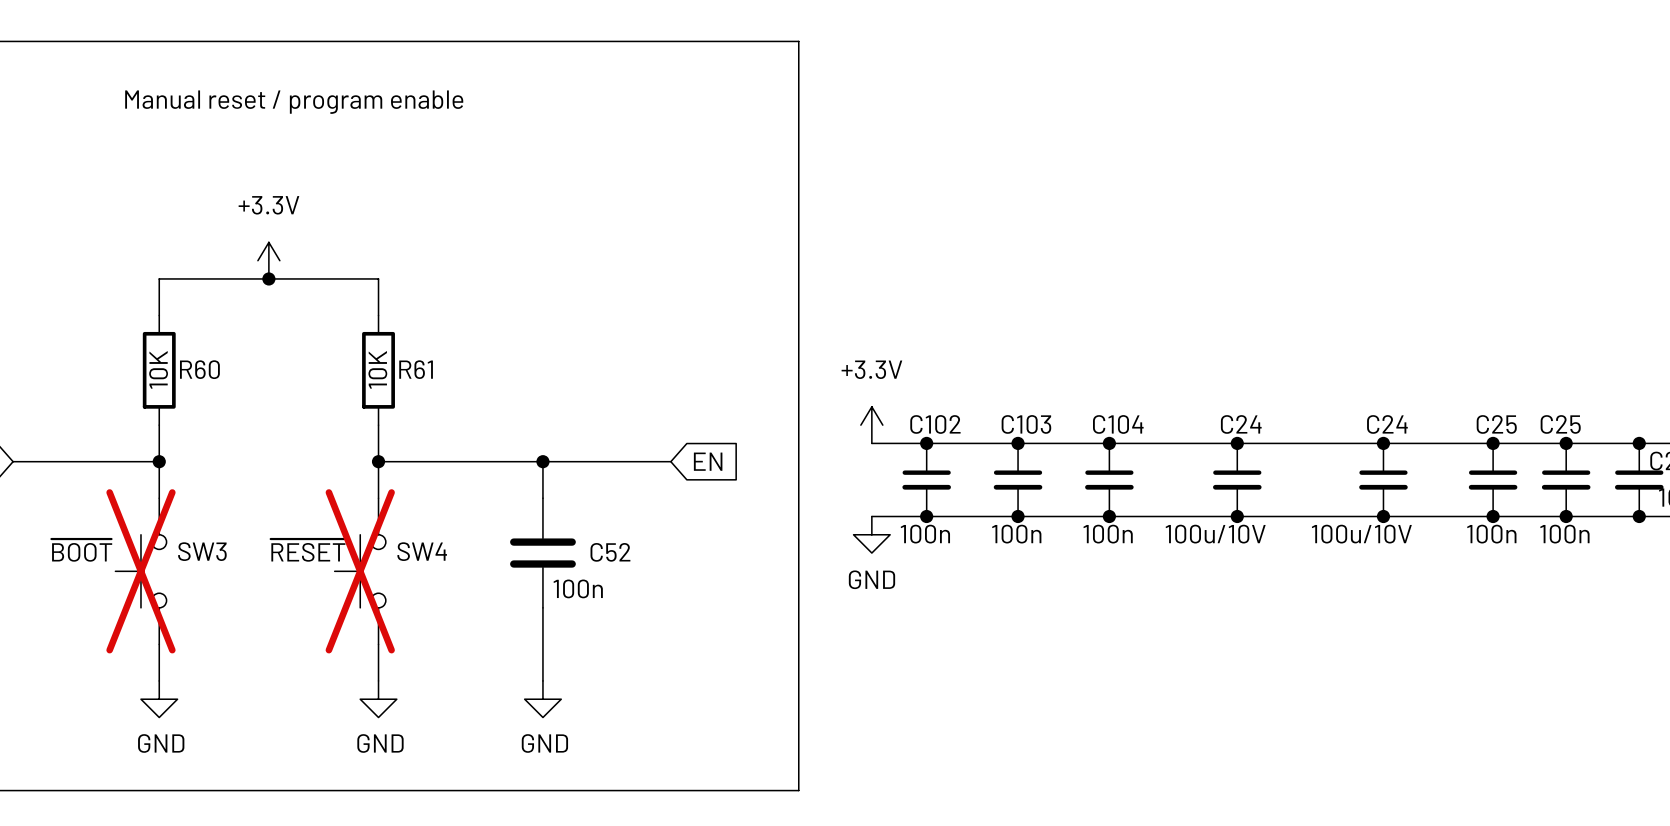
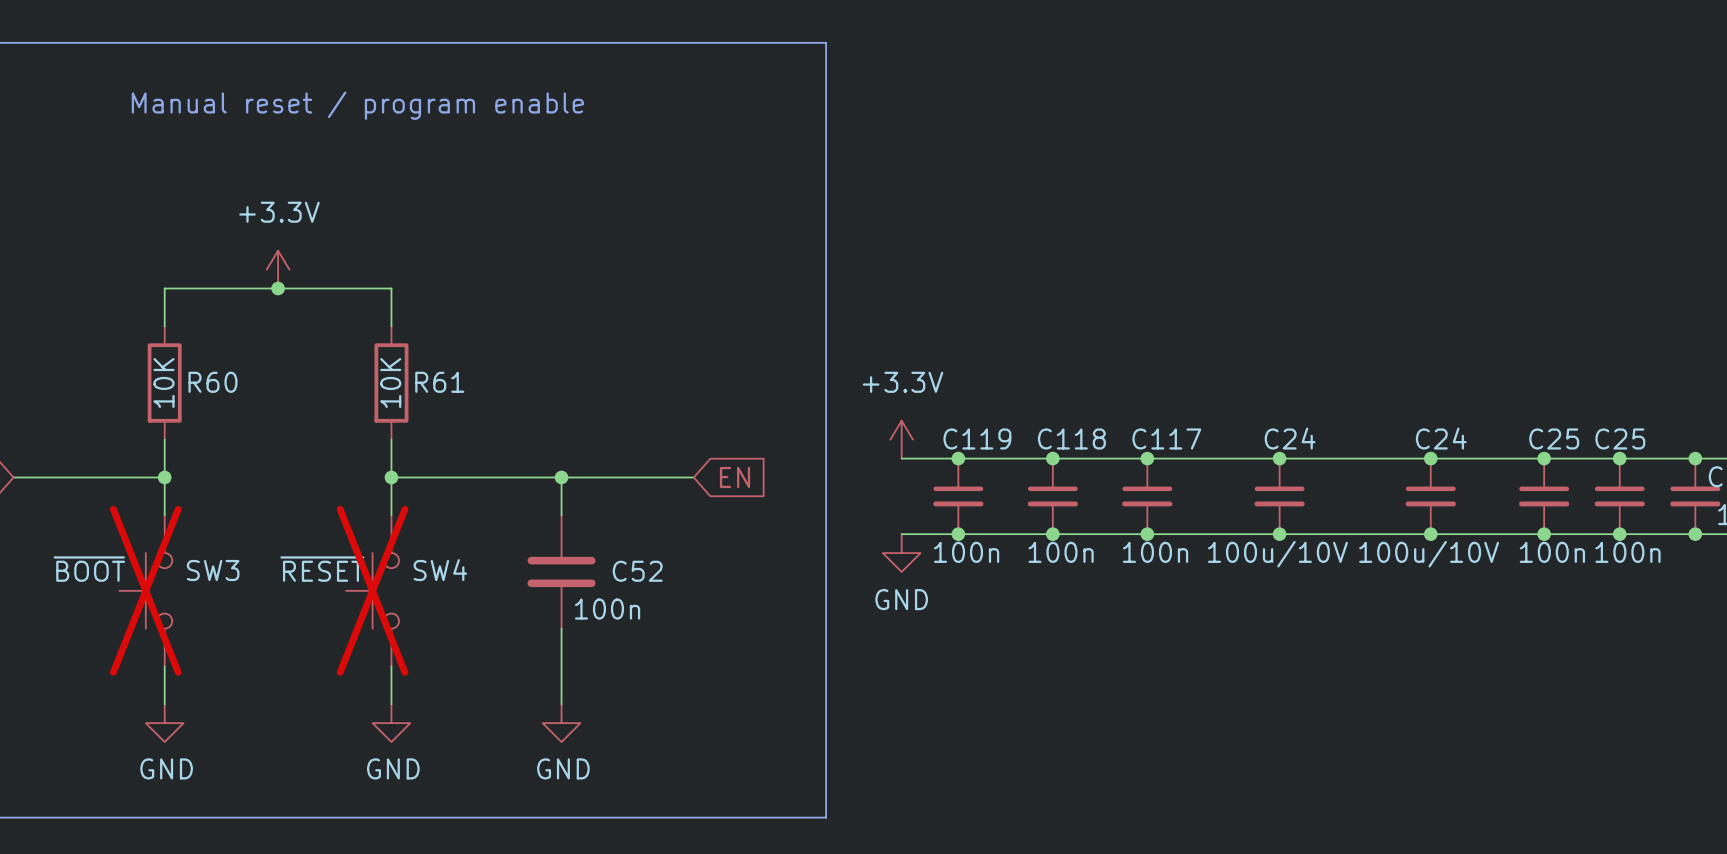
C102 name: C102 (935, 424) -> C119 (977, 438)
C103 name: C103 (1026, 424) -> C118 (1071, 438)
C104 name: C104 (1118, 424) -> C117 (1166, 438)

